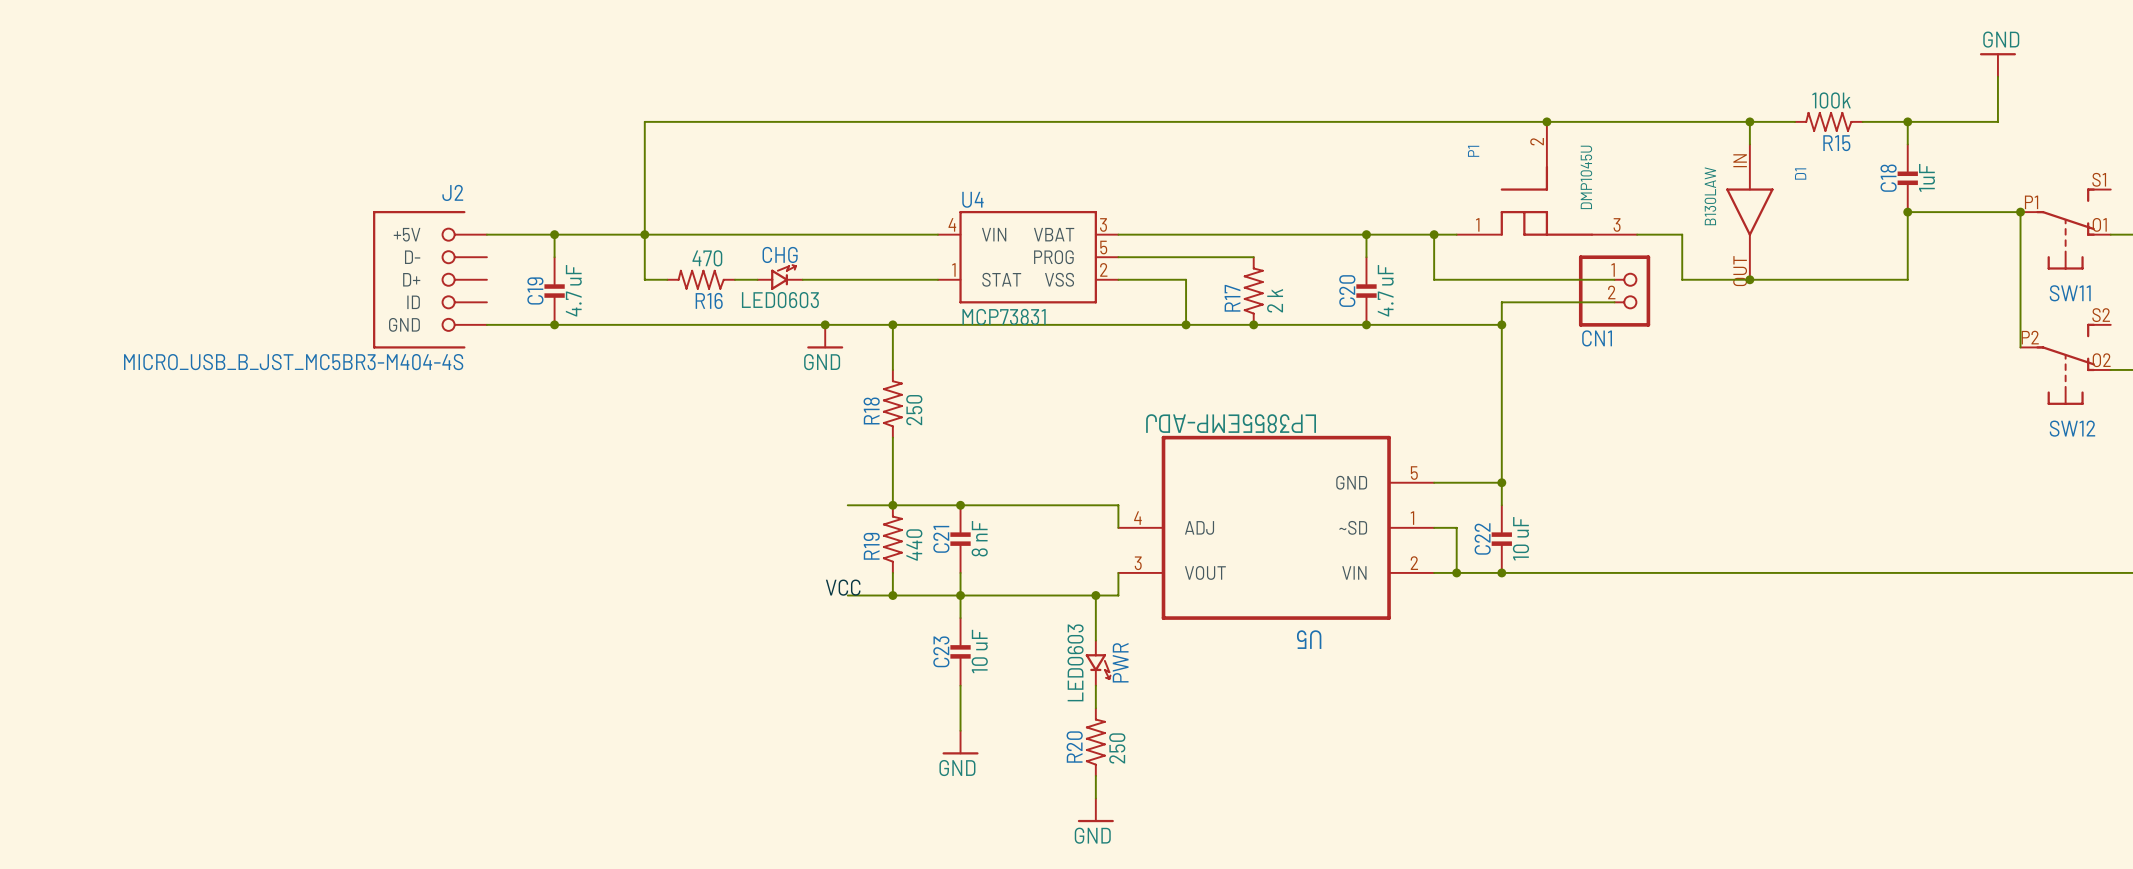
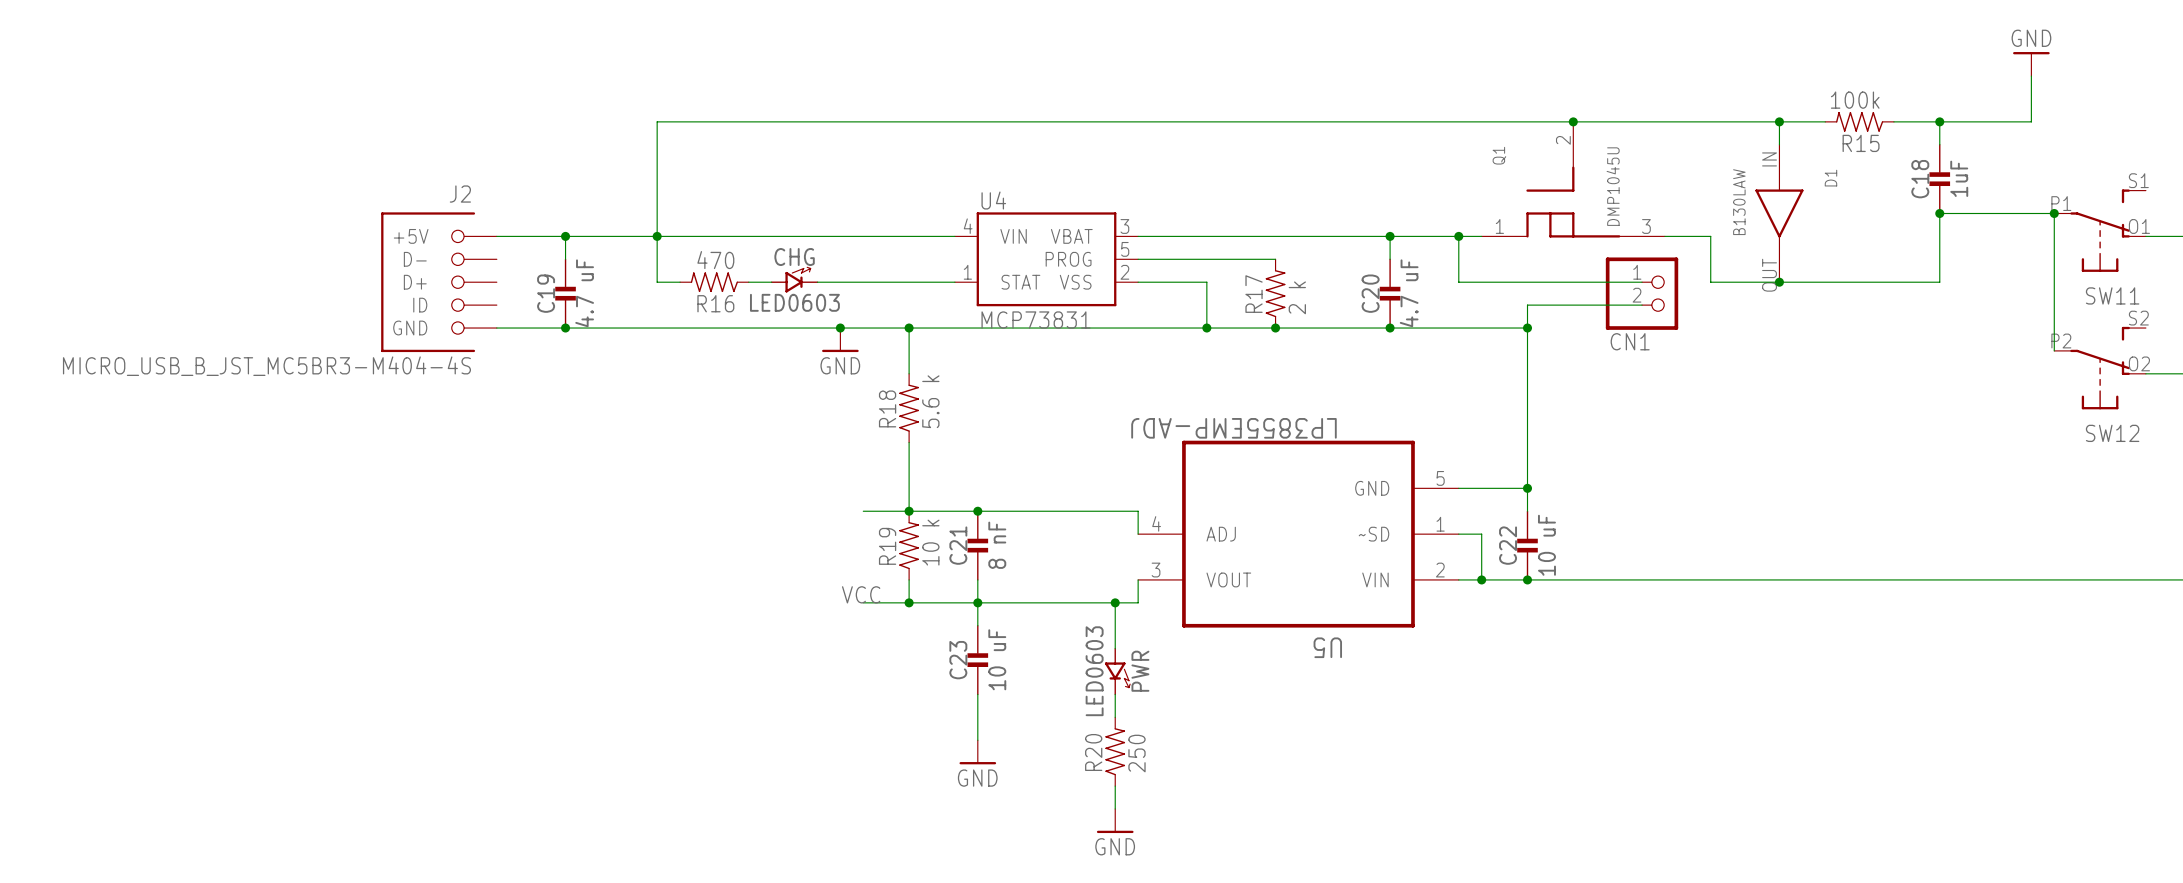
P1 name: P1 (1473, 151) -> Q1 (1499, 155)
R18 value: 250 (914, 410) -> 5.6 k (930, 401)
R19 value: 440 (914, 544) -> 10 k (930, 542)

